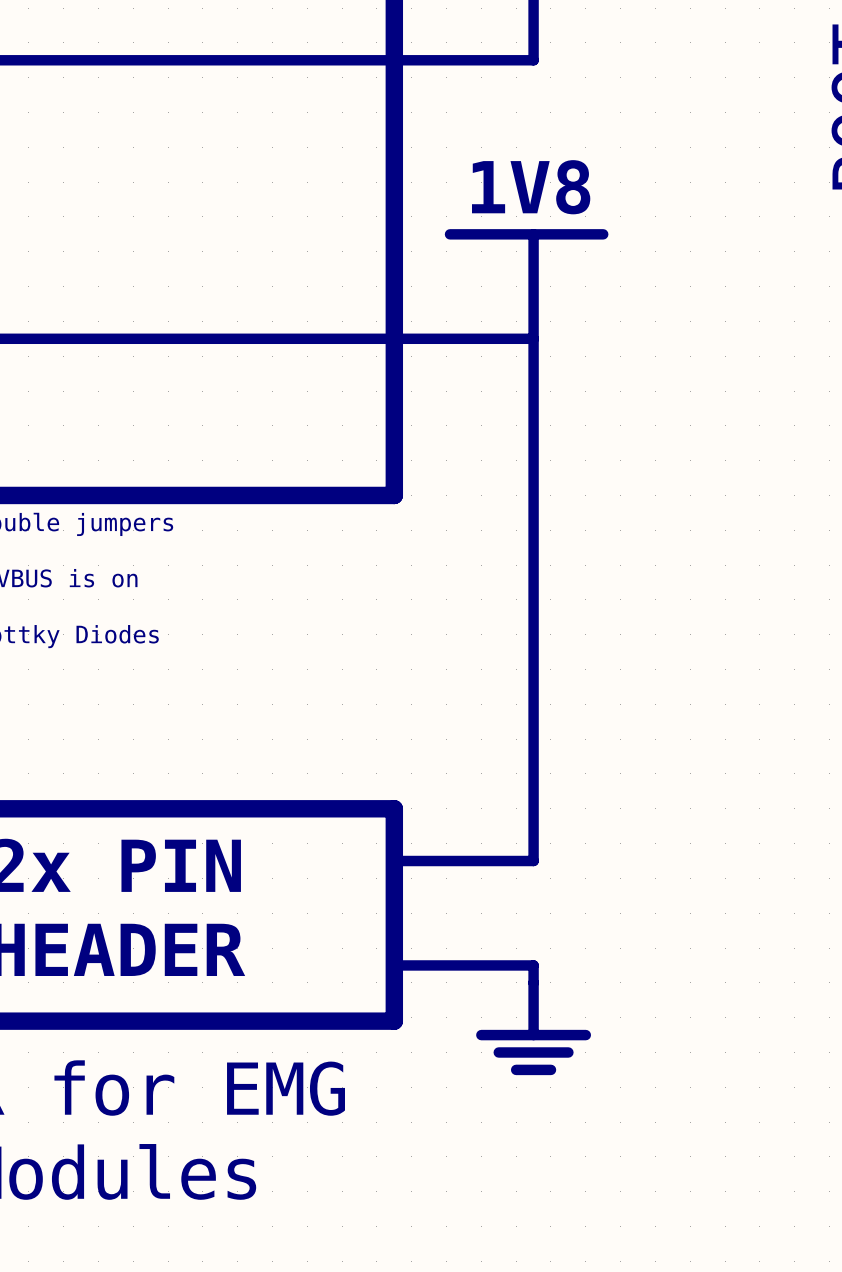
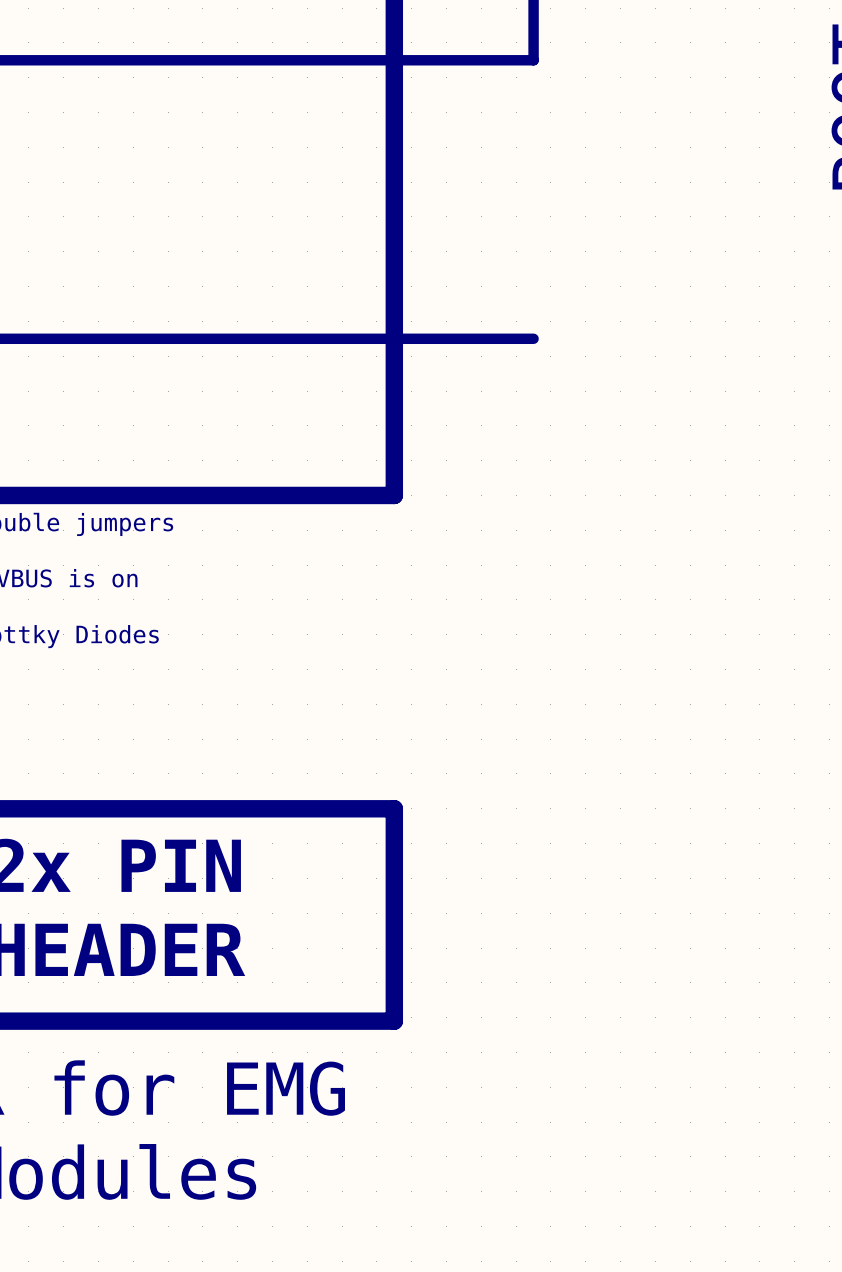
text: 1V8 (531, 187) -> none
line: (450, 234) (603, 234) -> none
line: (533, 234) (533, 861) (394, 861) -> none
line: (394, 965) (533, 965) (533, 1035) -> none
line: (481, 1035) (585, 1035) -> none
line: (498, 1052) (568, 1052) -> none
line: (516, 1069) (550, 1069) -> none

